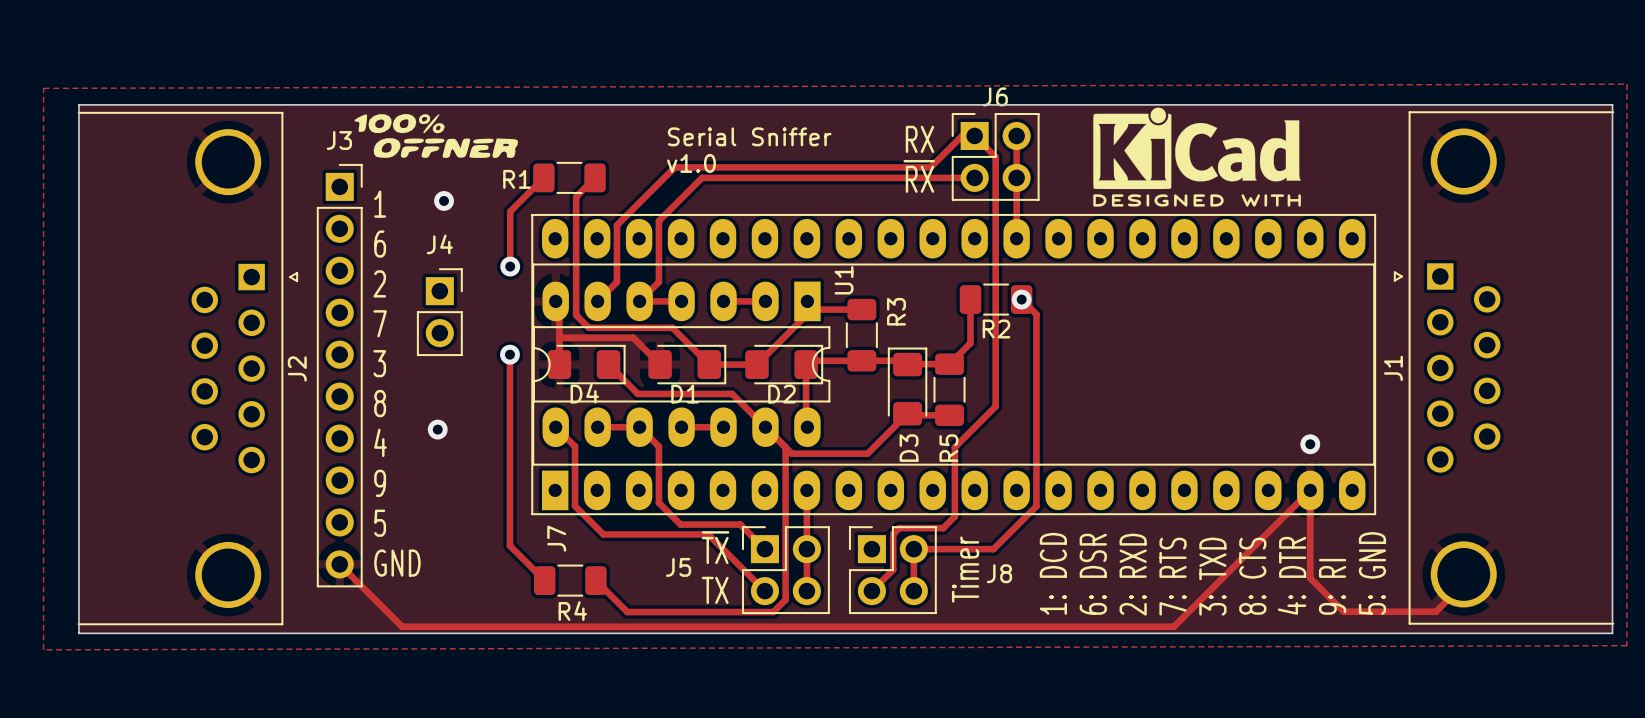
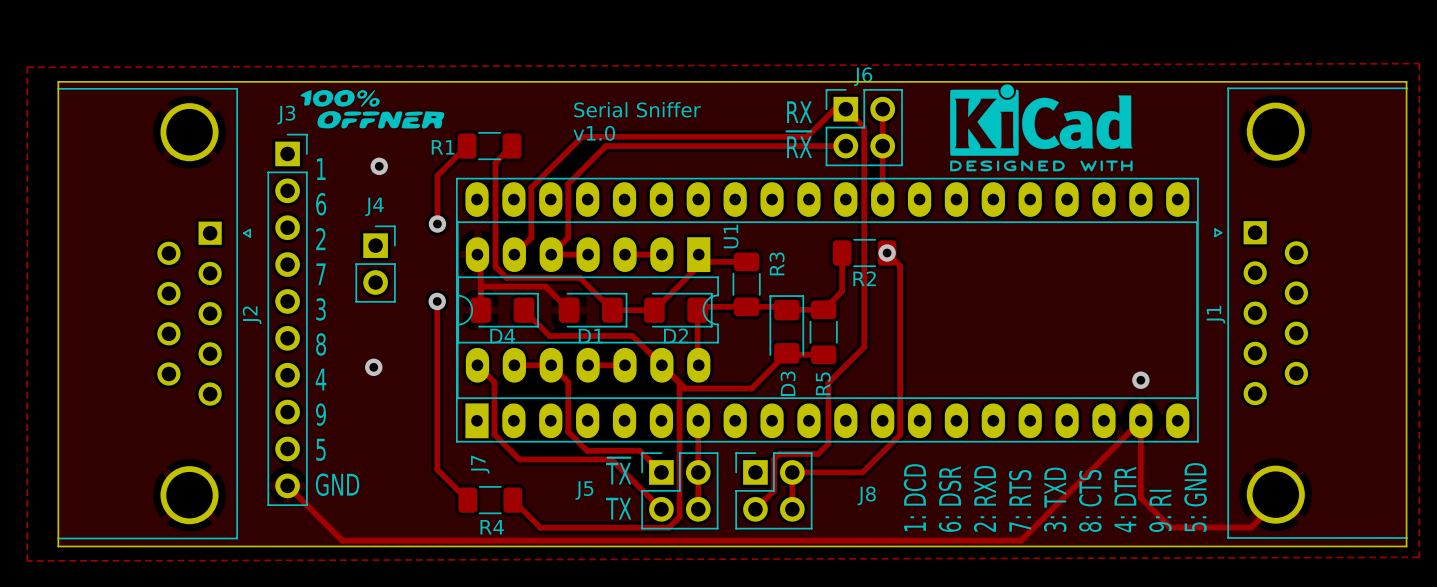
text: Timer (965, 569) -> none

